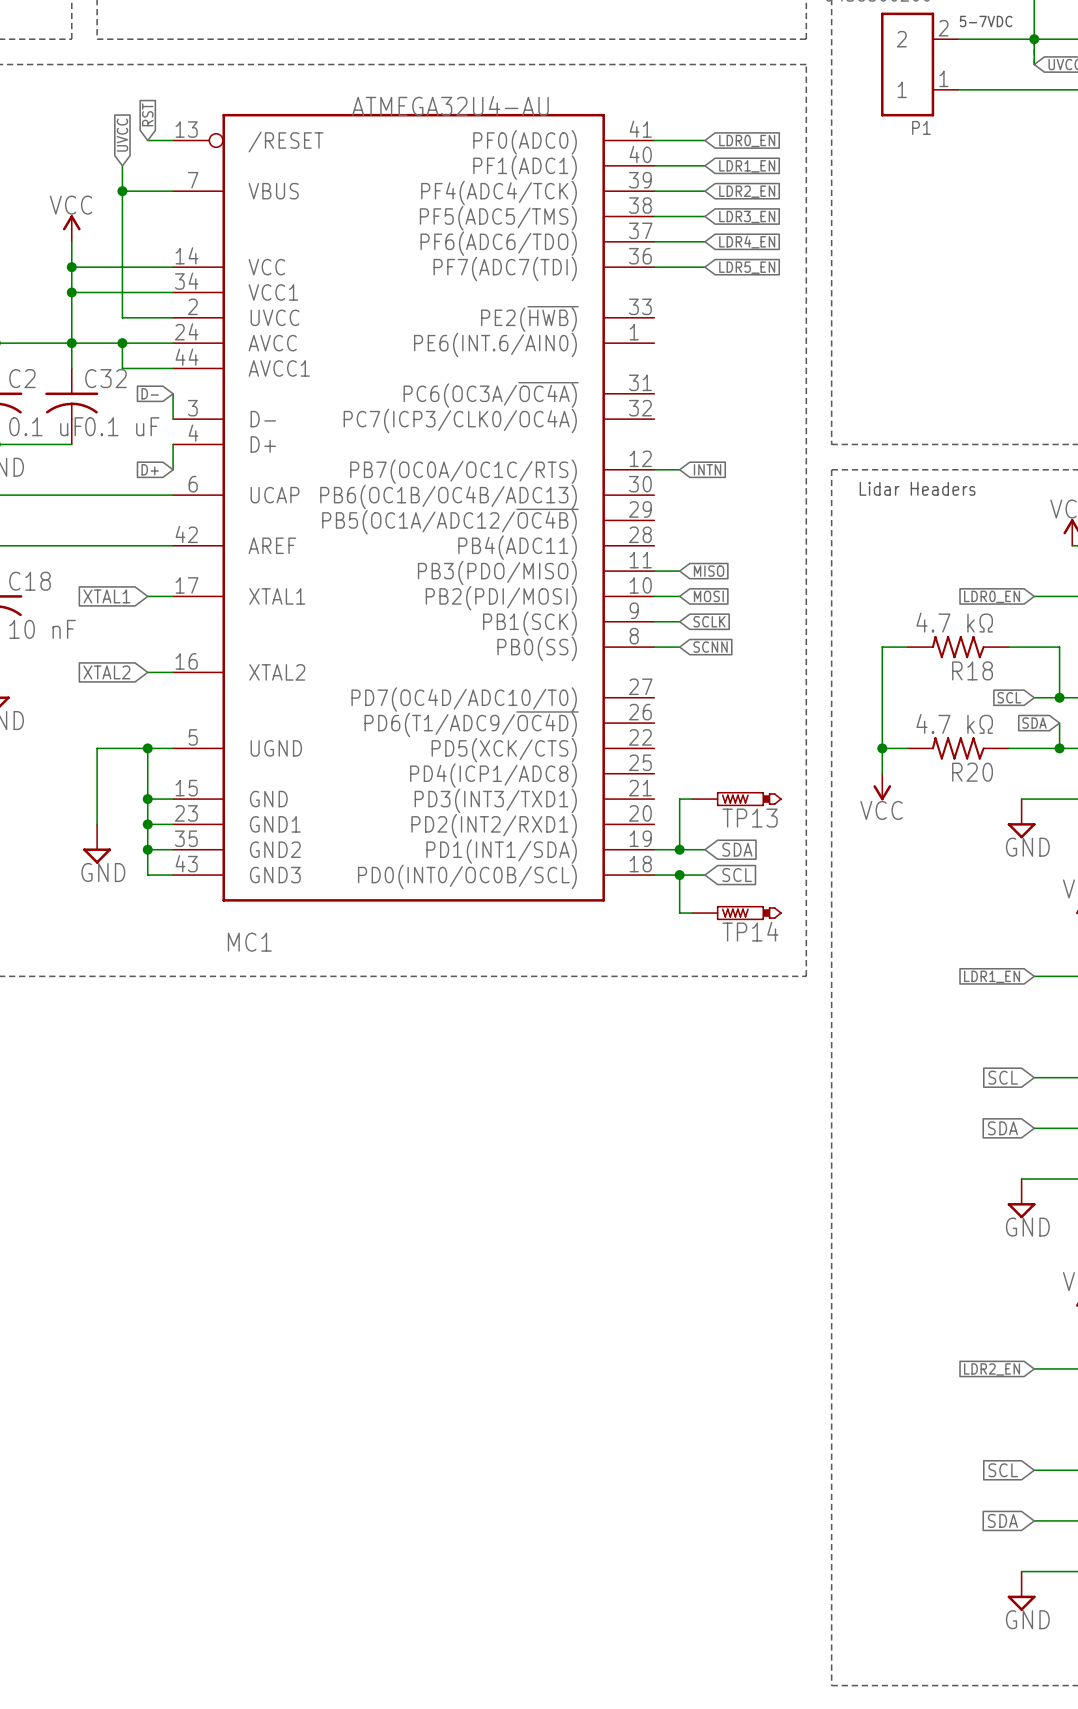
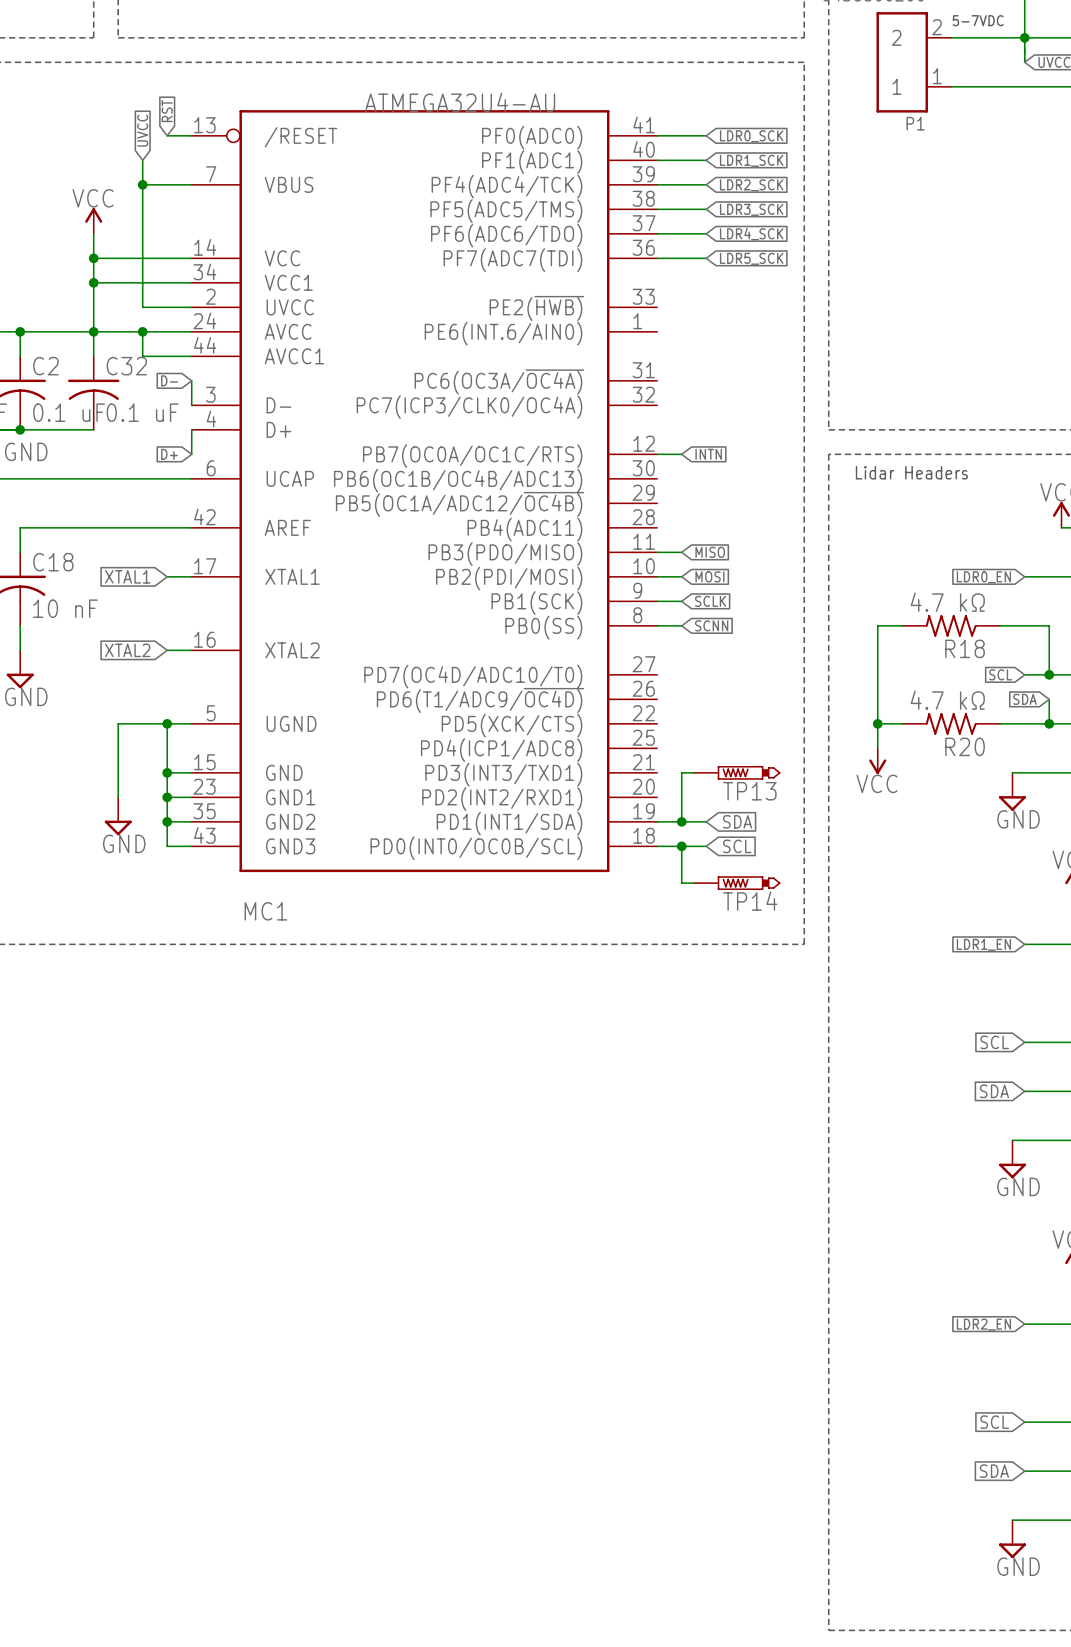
global label: LDR0_EN (747, 140) -> LDR0_SCK (751, 136)
global label: LDR1_EN (747, 166) -> LDR1_SCK (751, 160)
global label: LDR2_EN (747, 191) -> LDR2_SCK (751, 185)
global label: LDR3_EN (747, 216) -> LDR3_SCK (751, 209)
global label: LDR4_EN (747, 242) -> LDR4_SCK (751, 234)
global label: LDR5_EN (747, 267) -> LDR5_SCK (751, 258)

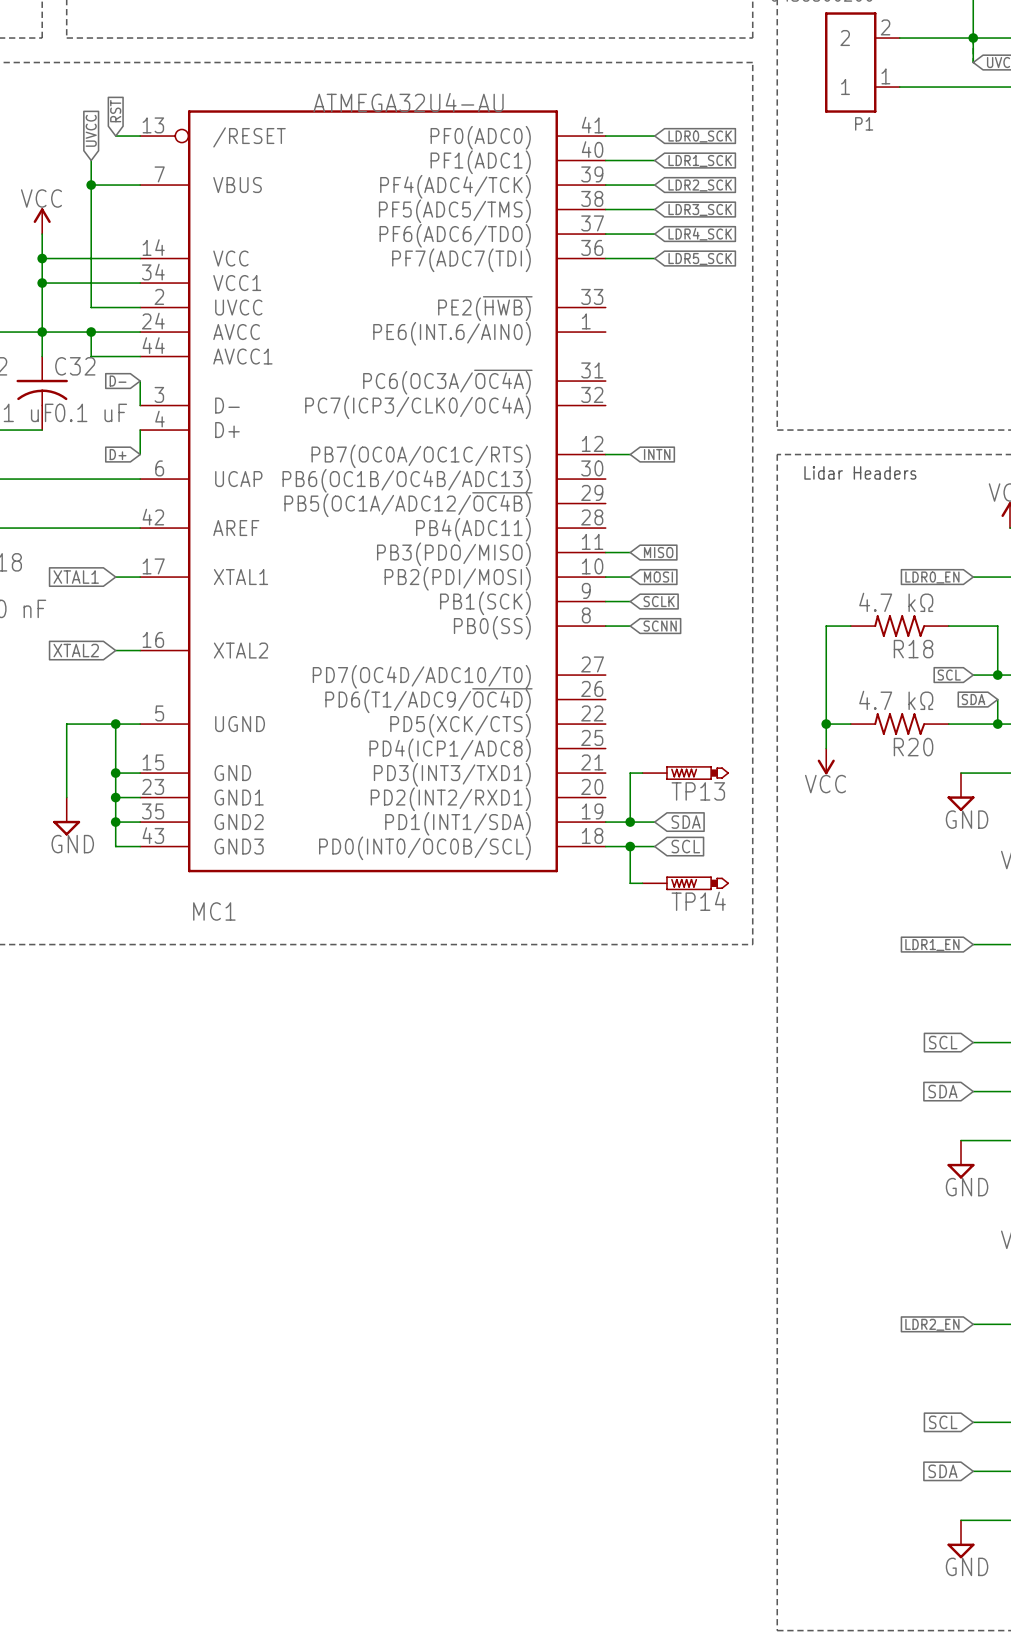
text: 5-7VDC (978, 20) -> none

